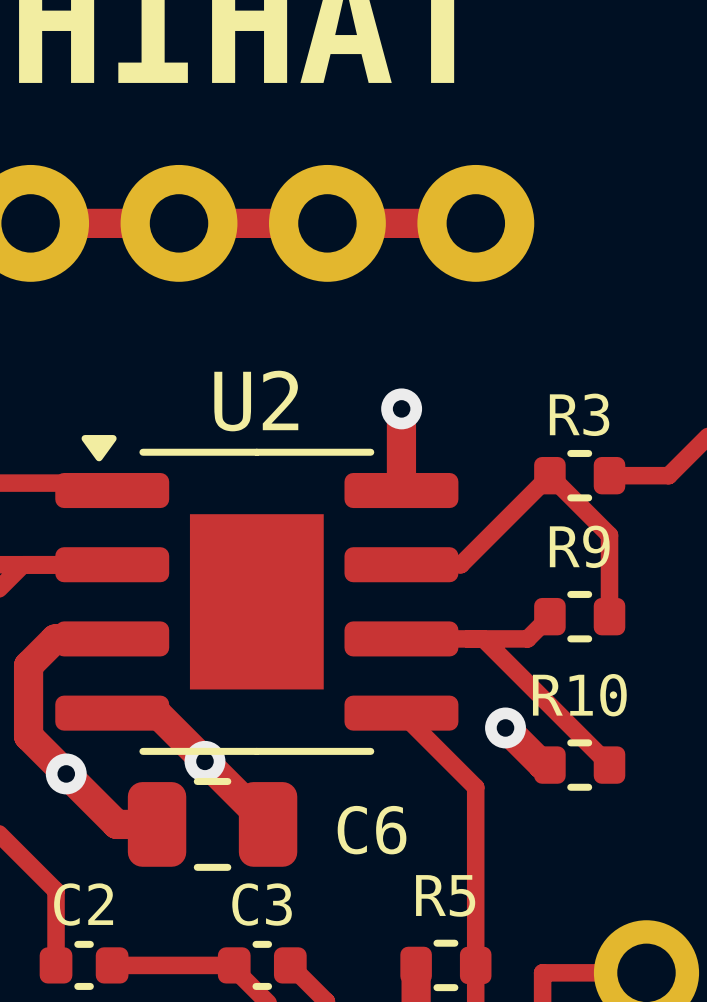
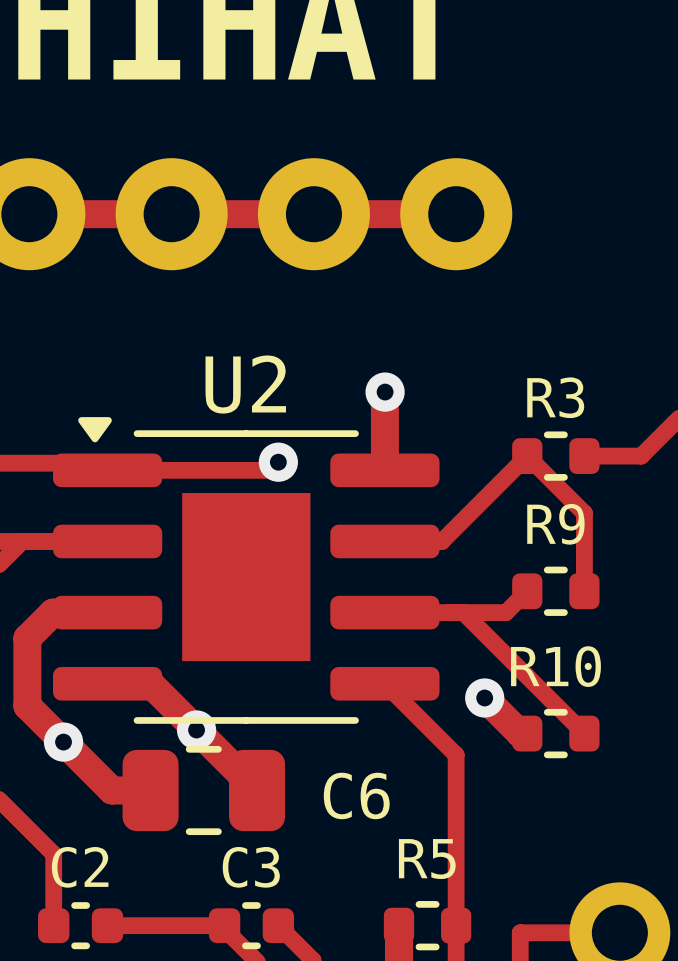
track: none -> (278, 462) (270, 470) (107, 470)
via: none -> (278, 462)

